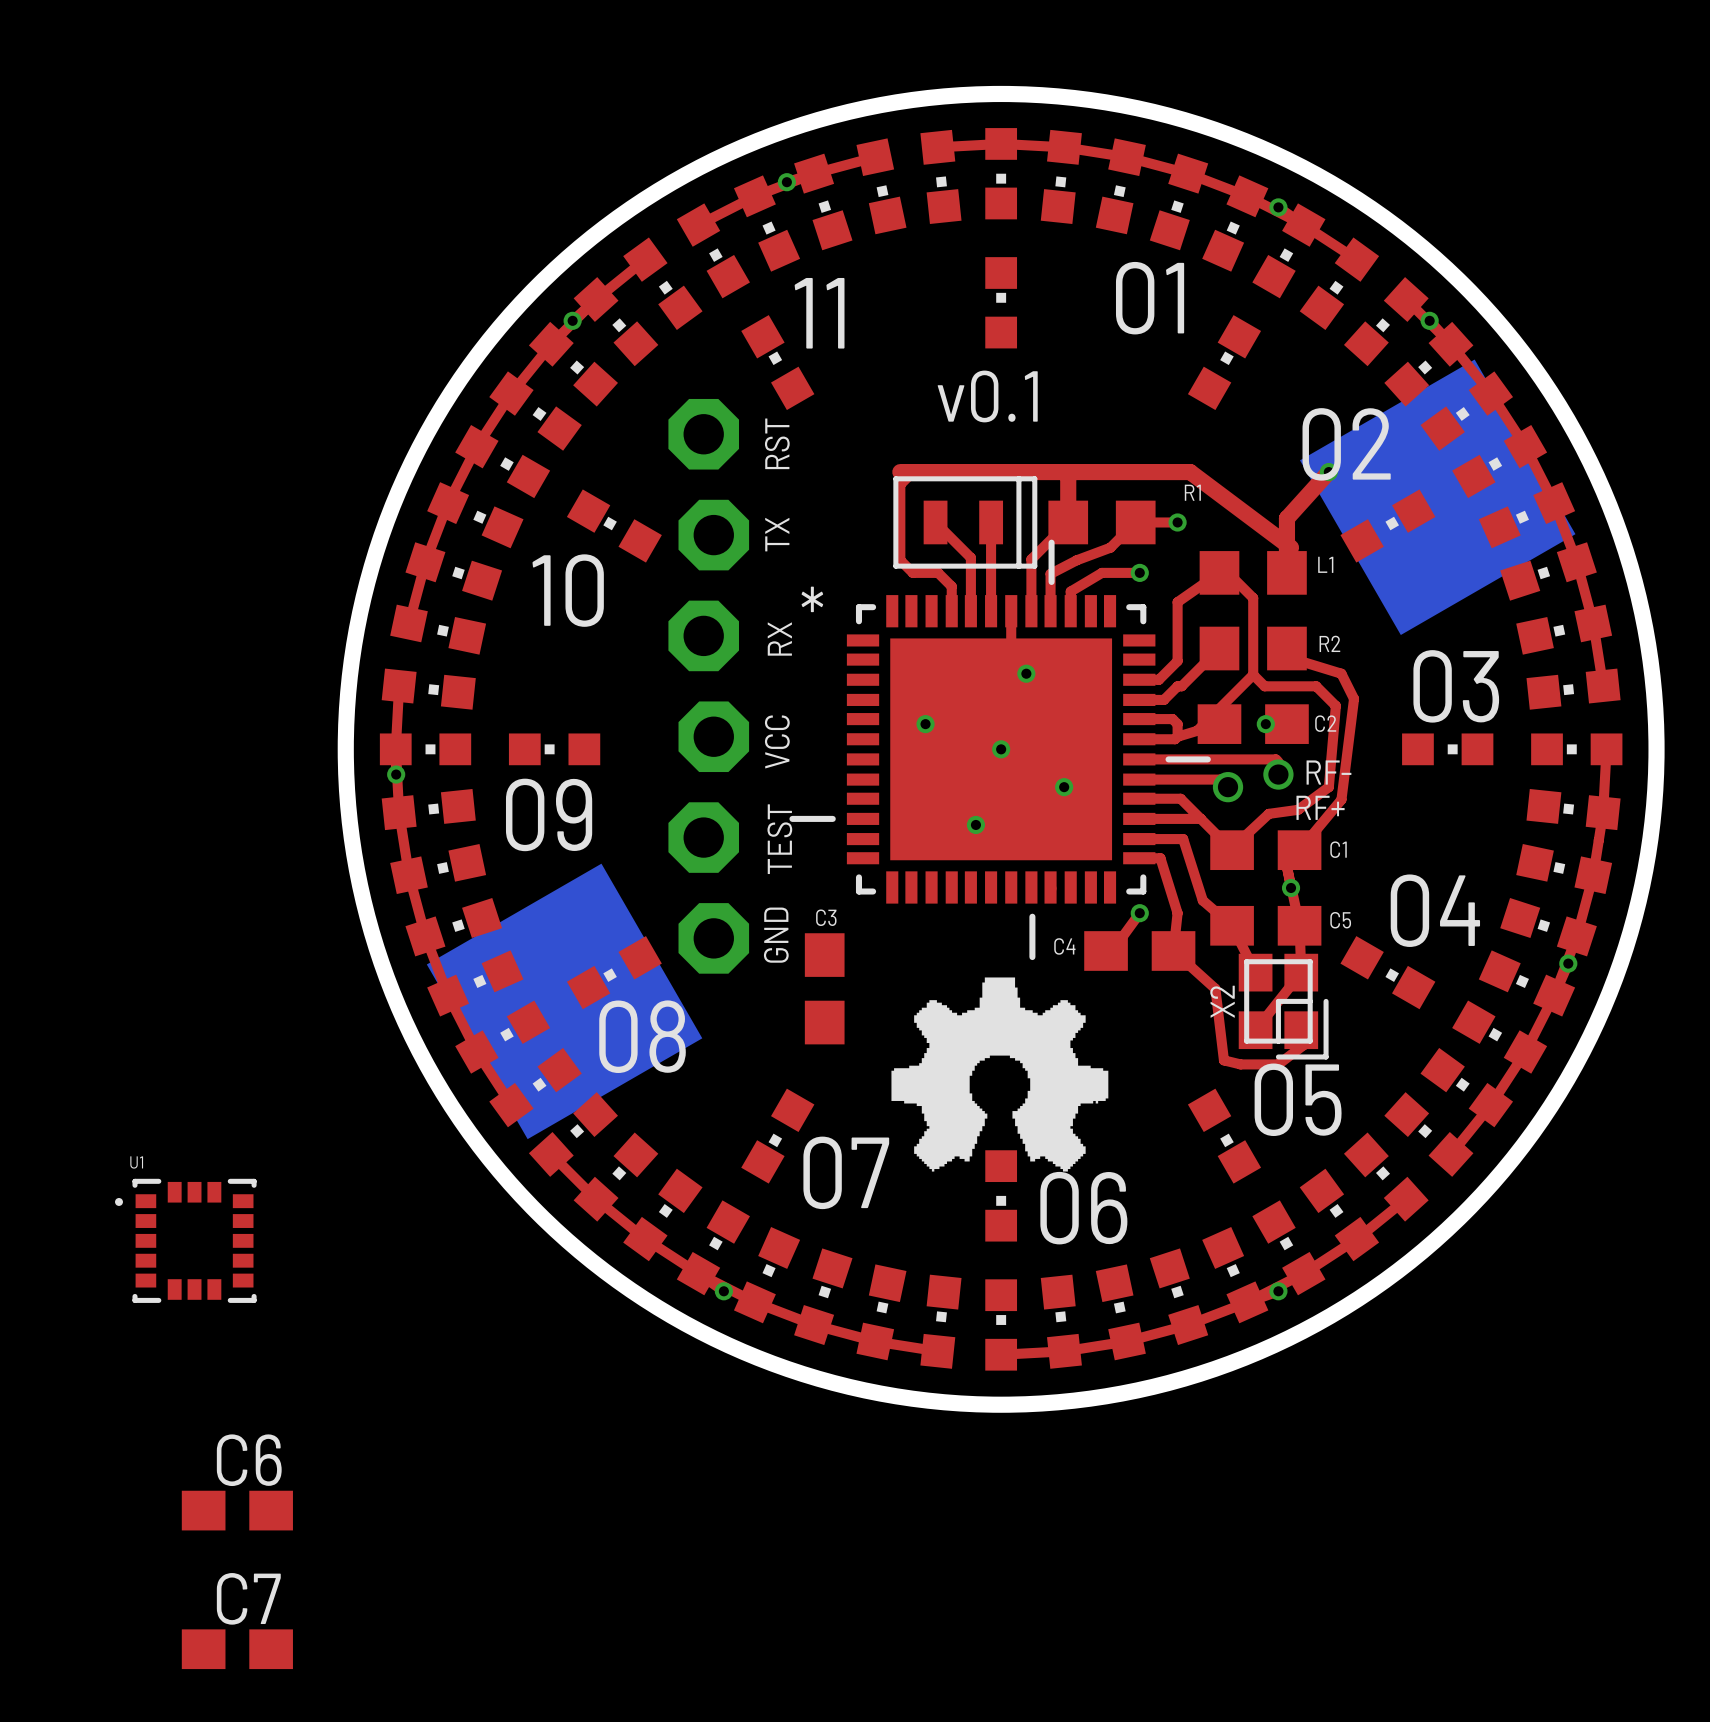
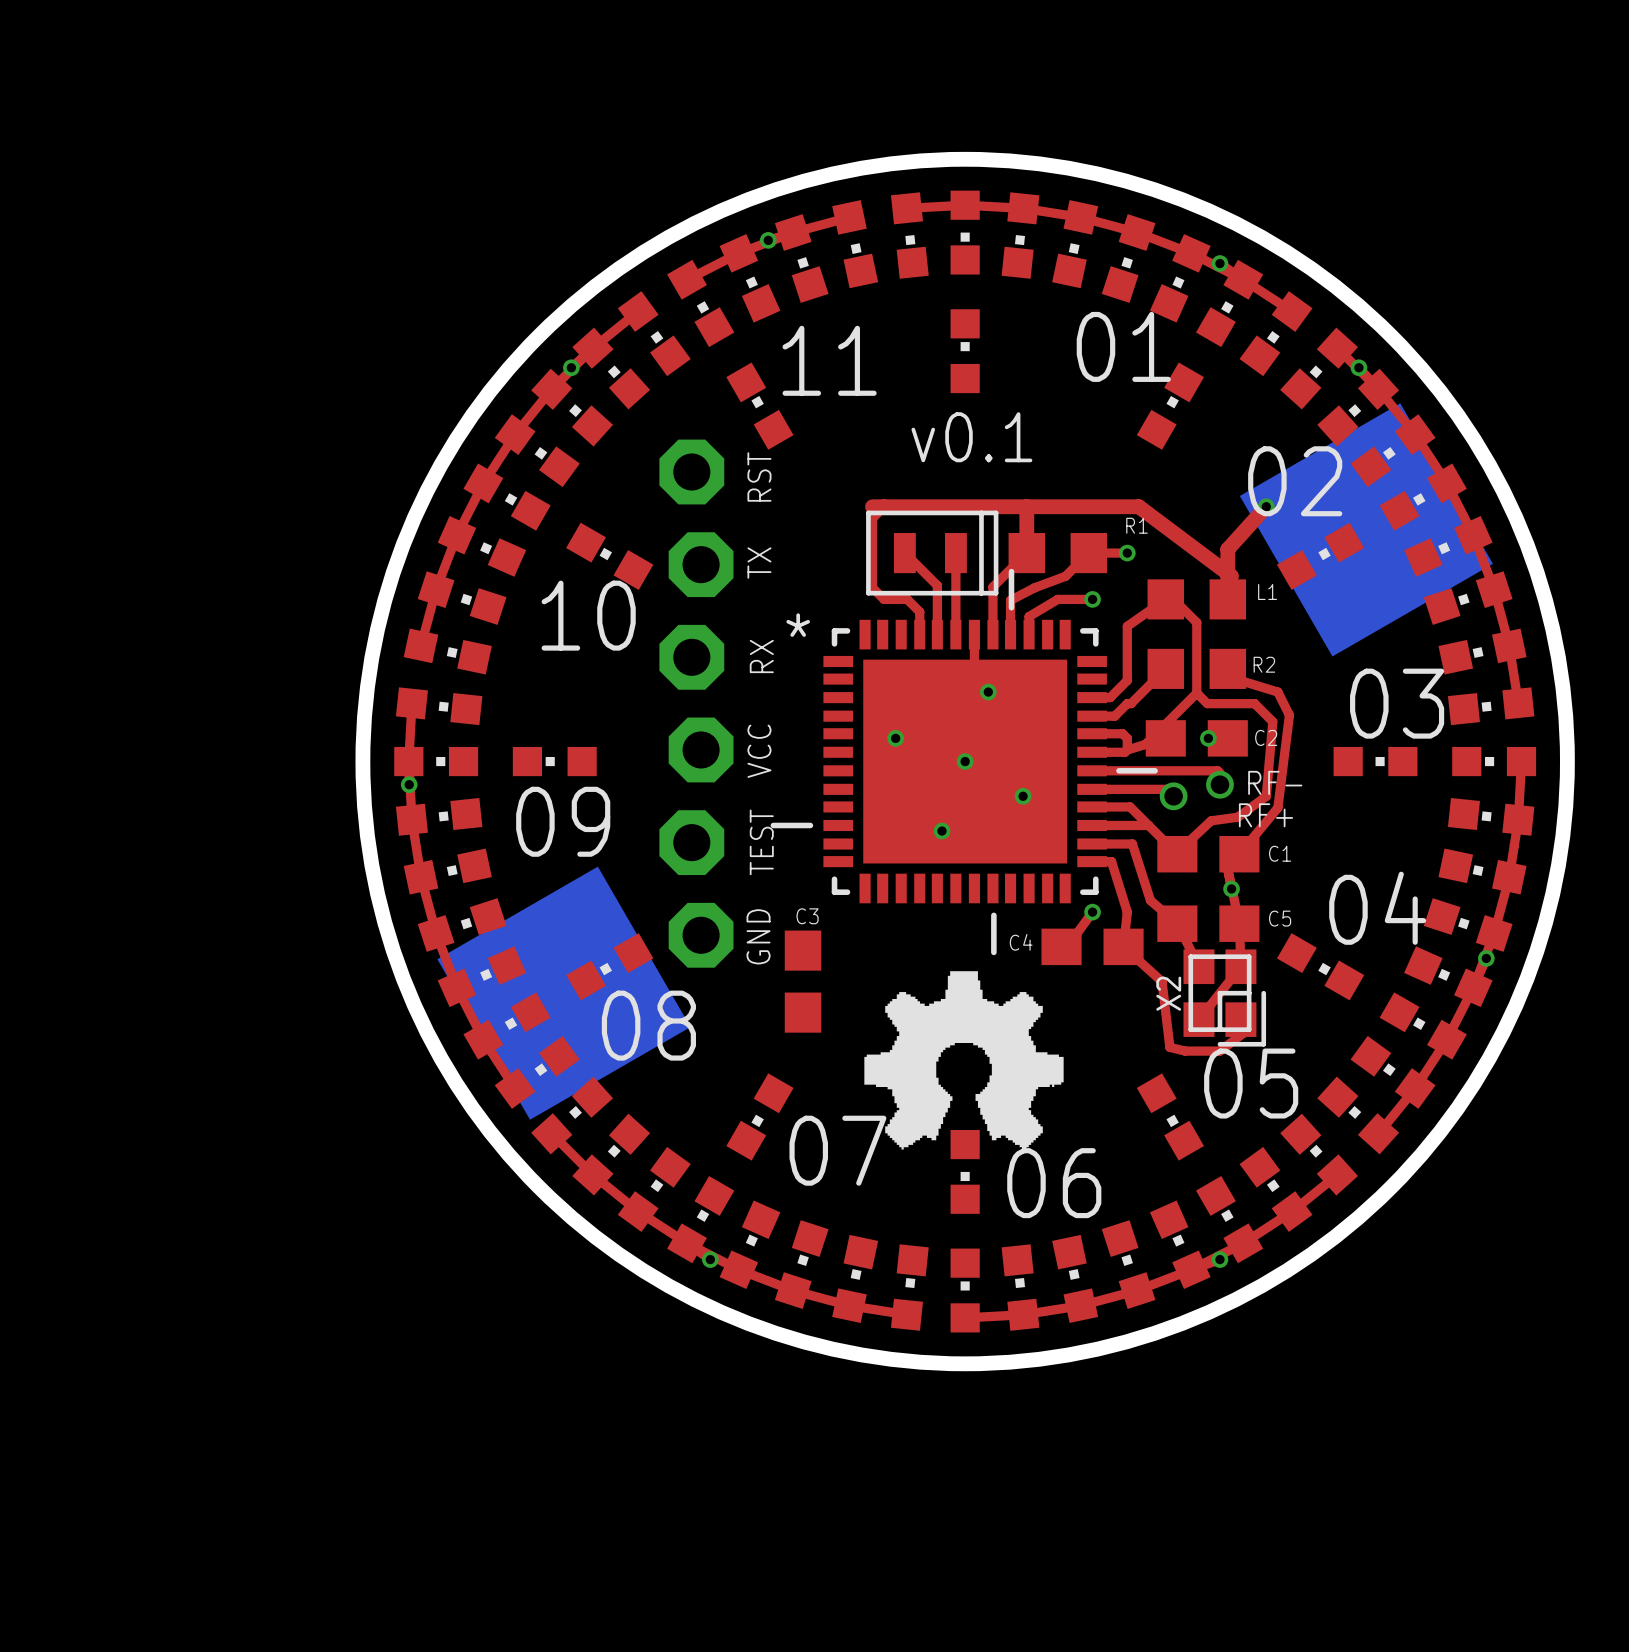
U1: (185, 1240) -> none
C6: (237, 1510) -> none
C7: (237, 1649) -> none

